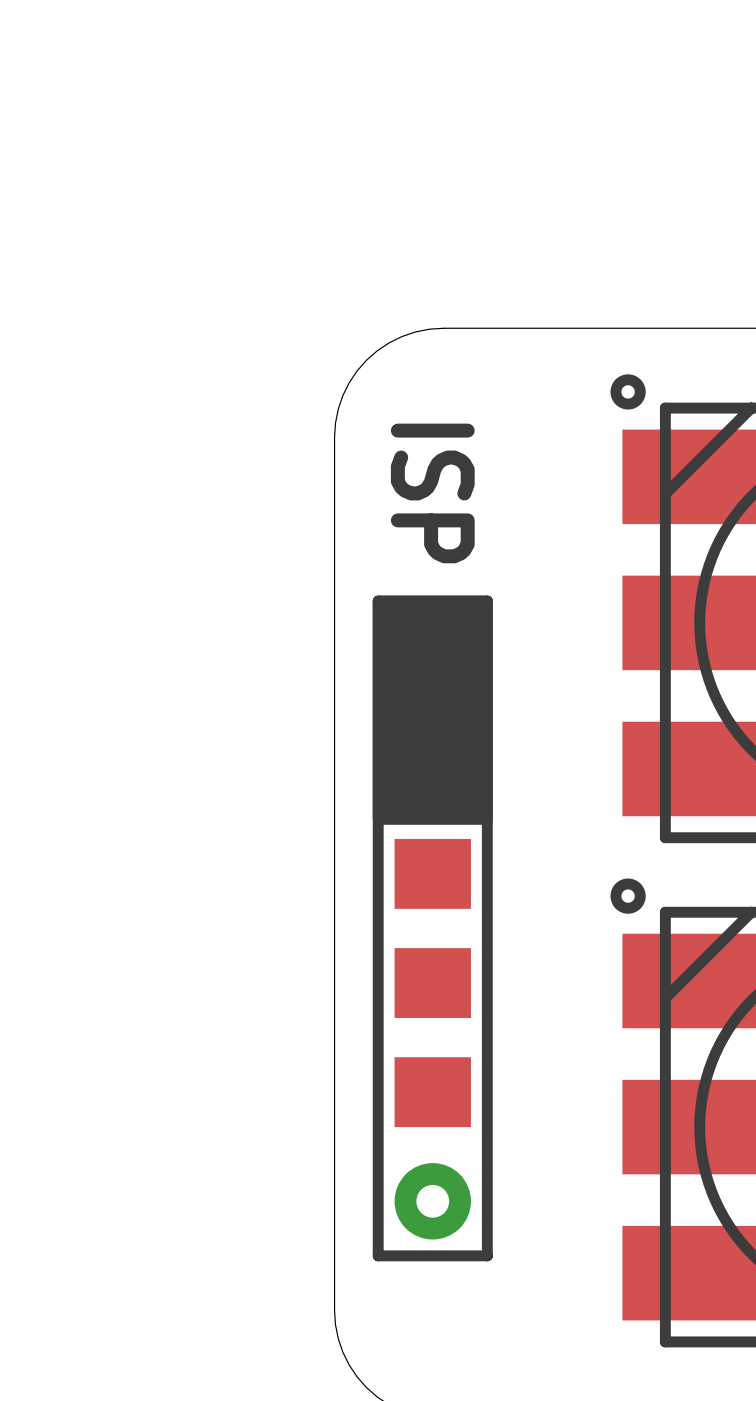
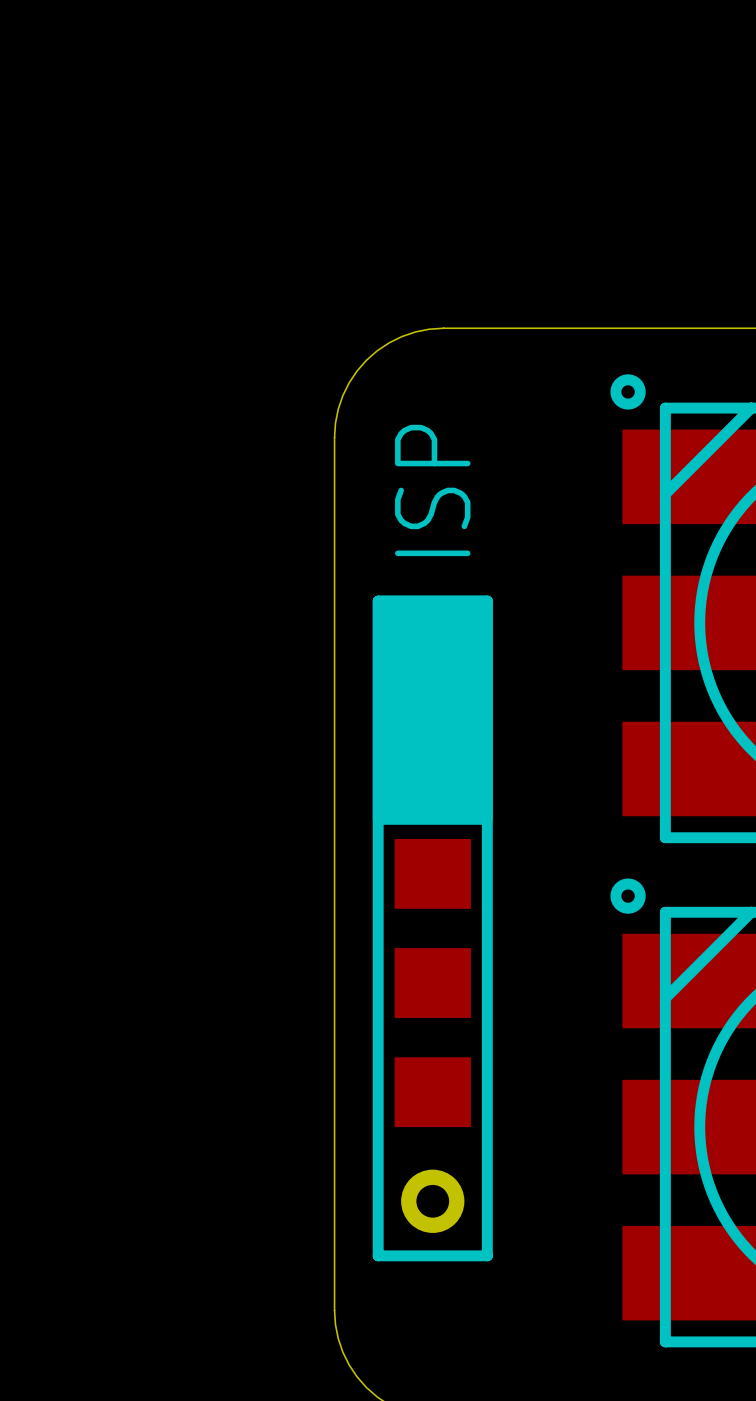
ISP name rotation: 0° (432, 493) -> 180° (432, 490)
ISP footprint: [372, 595, 493, 1262] -> [372, 595, 493, 1262]

